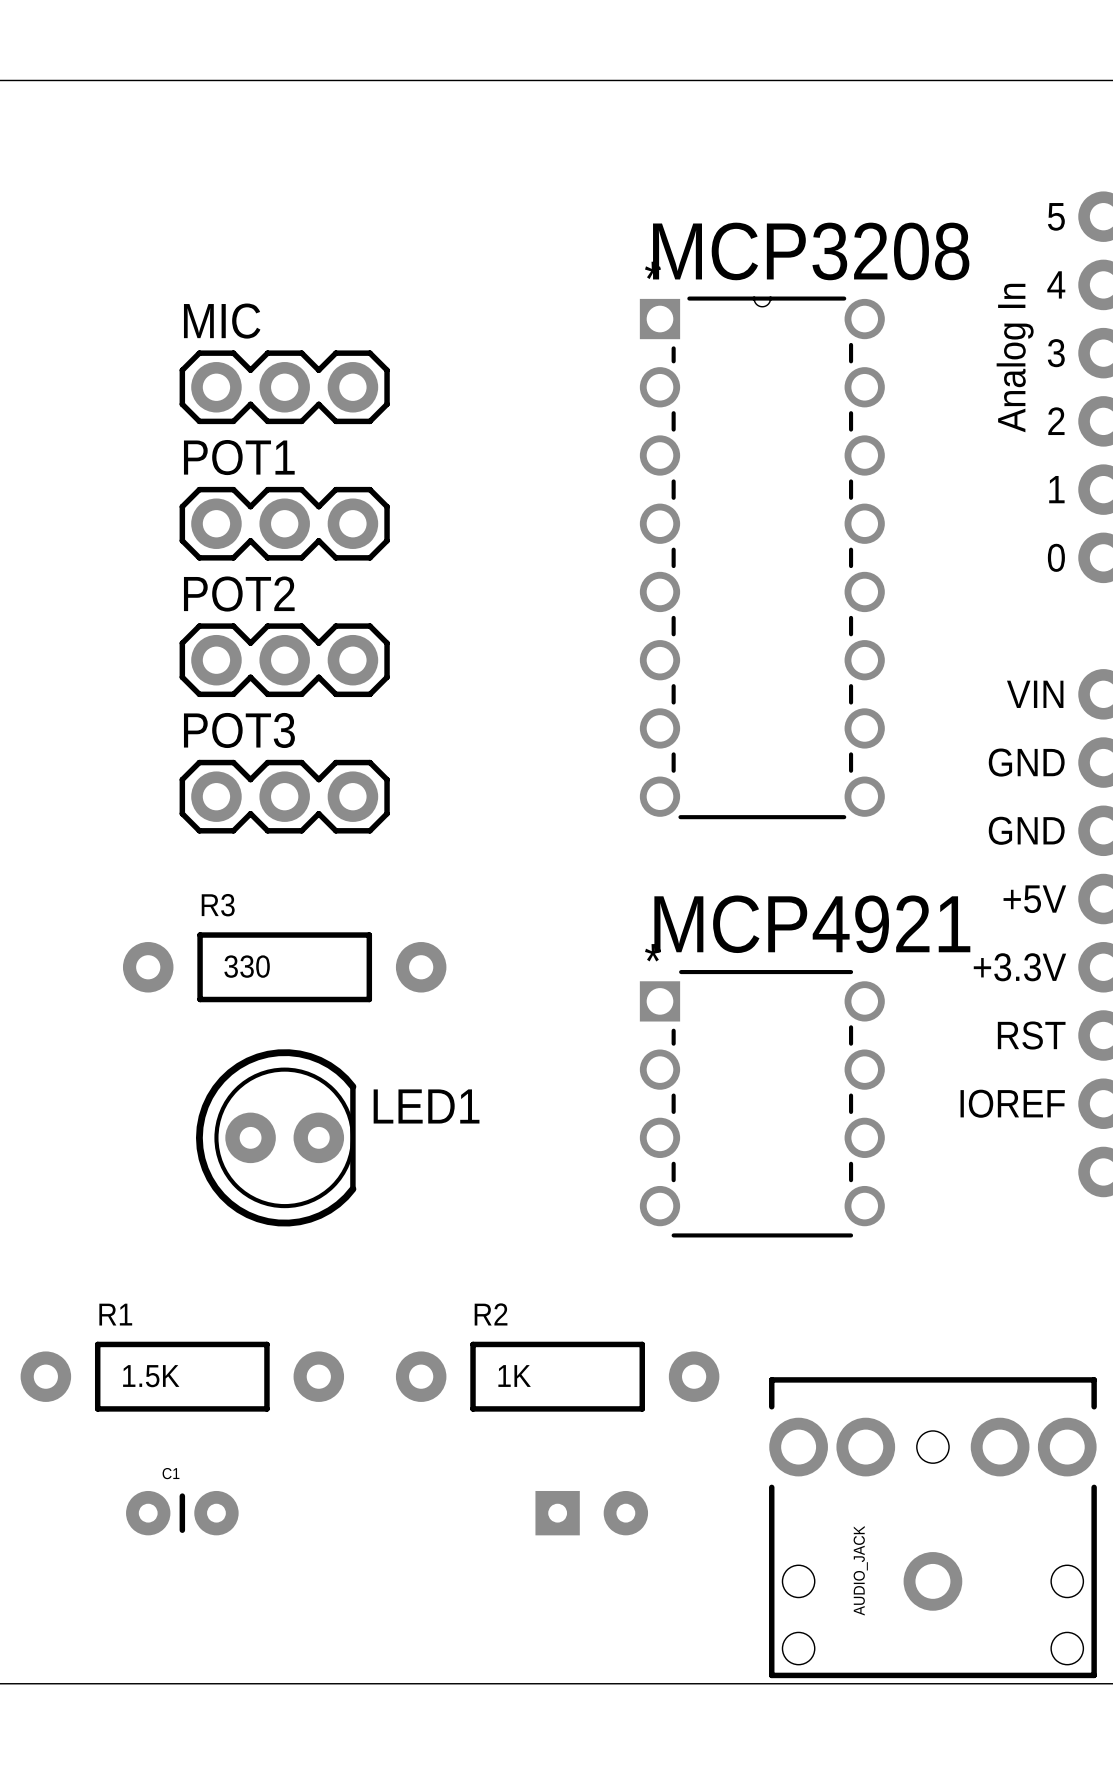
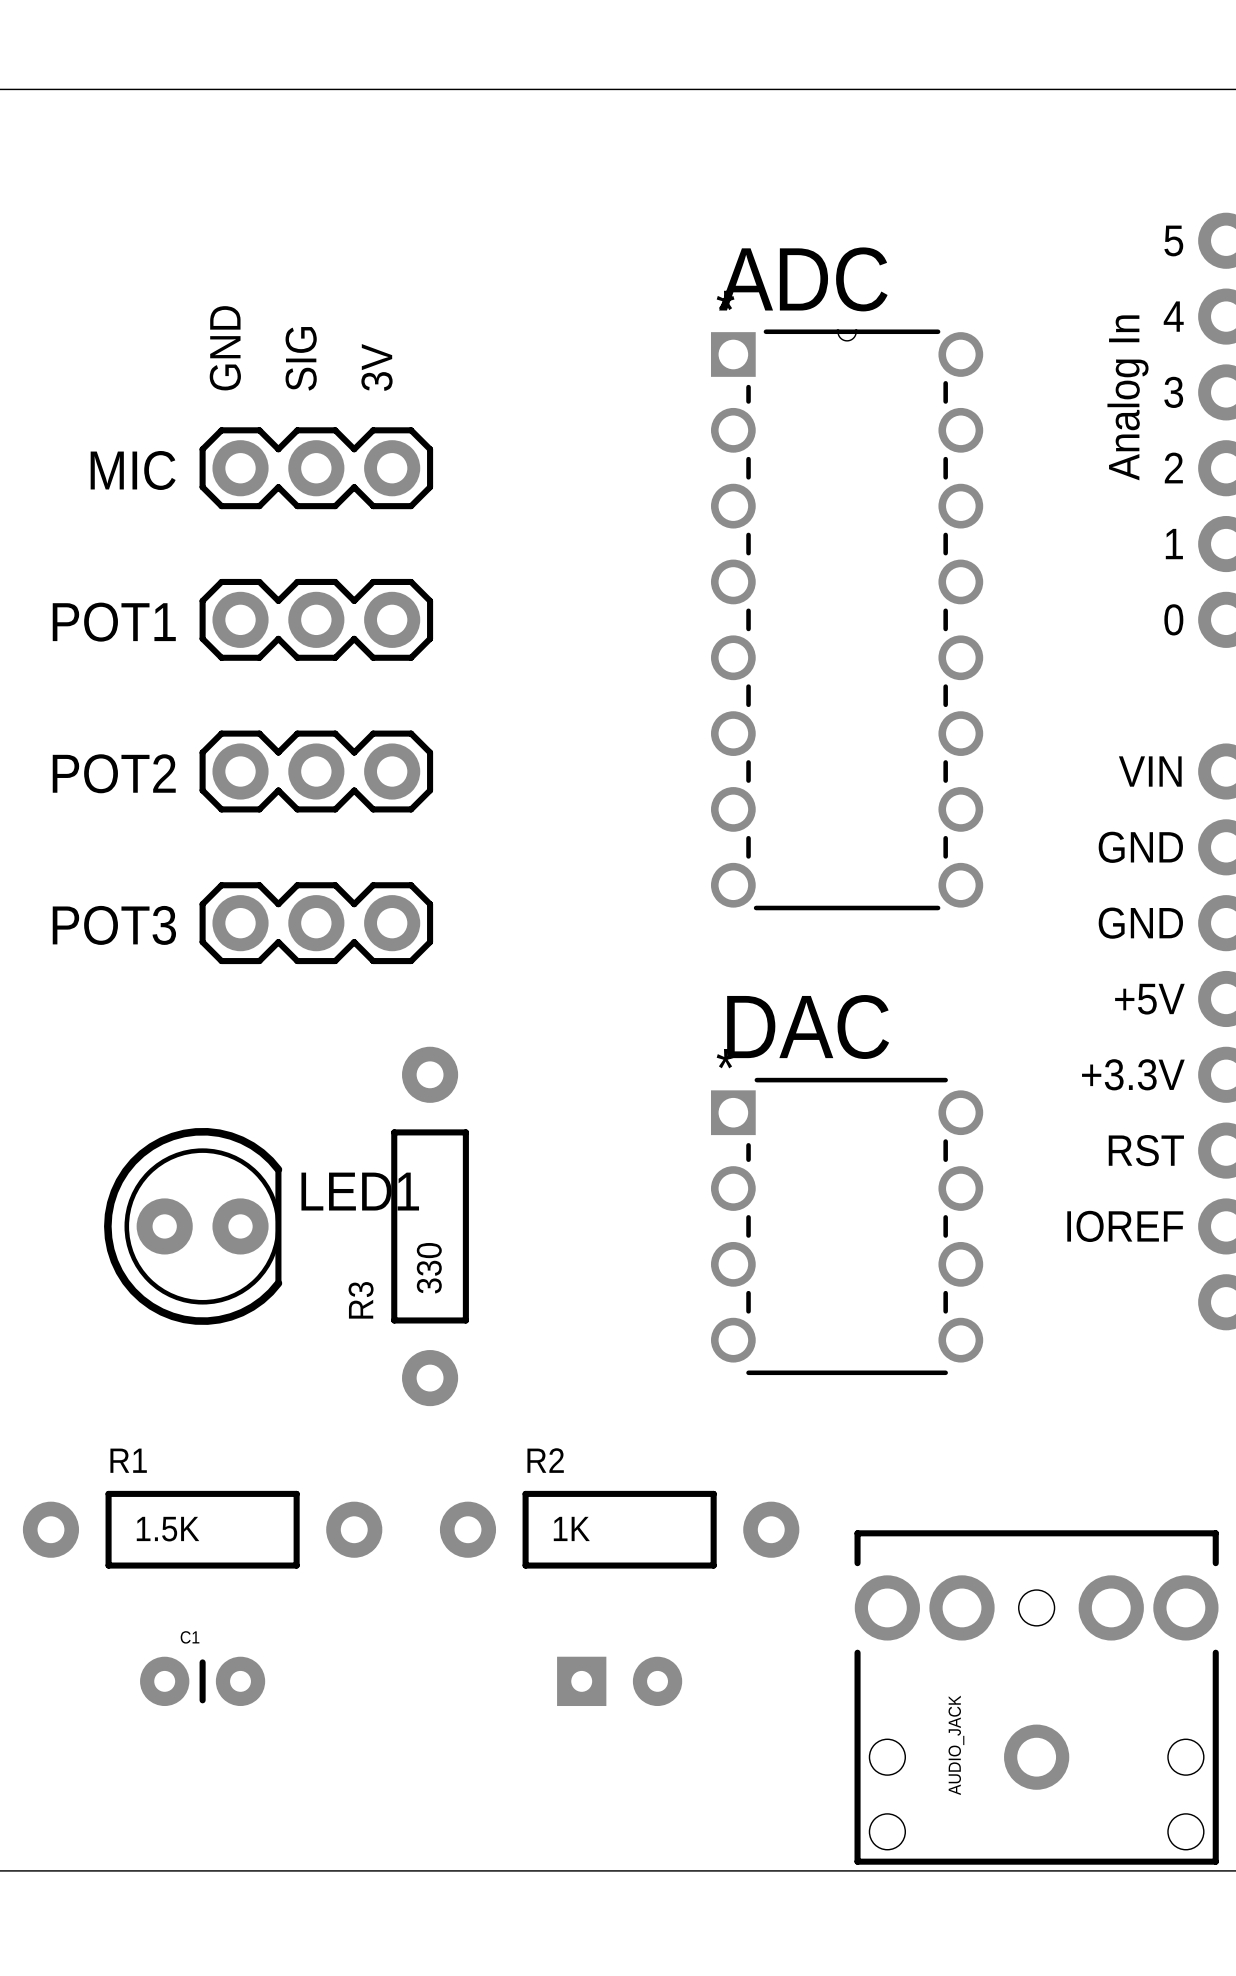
MCP3208 name: MCP3208 (811, 251) -> ADC (803, 279)
text: none -> GND (225, 348)
MIC name position: MIC (222, 321) -> MIC (133, 470)
text: none -> SIG (301, 358)
text: none -> 3V (376, 367)
MIC position: (284, 387) -> (316, 468)
POT1 name position: POT1 (239, 457) -> POT1 (114, 622)
POT1 position: (284, 523) -> (316, 619)
POT2 name position: POT2 (239, 594) -> POT2 (114, 773)
POT2 position: (284, 660) -> (316, 771)
POT3 name position: POT3 (239, 730) -> POT3 (114, 925)
POT3 position: (284, 796) -> (316, 923)
R3 name position: R3 (218, 905) -> R3 (361, 1300)
MCP4921 name: MCP4921 (812, 924) -> DAC (808, 1027)
R3 rotation: 0° (284, 967) -> 90° clockwise (430, 1226)
LED1 position: (276, 1137) -> (193, 1226)
part position: (591, 1513) -> (619, 1681)

